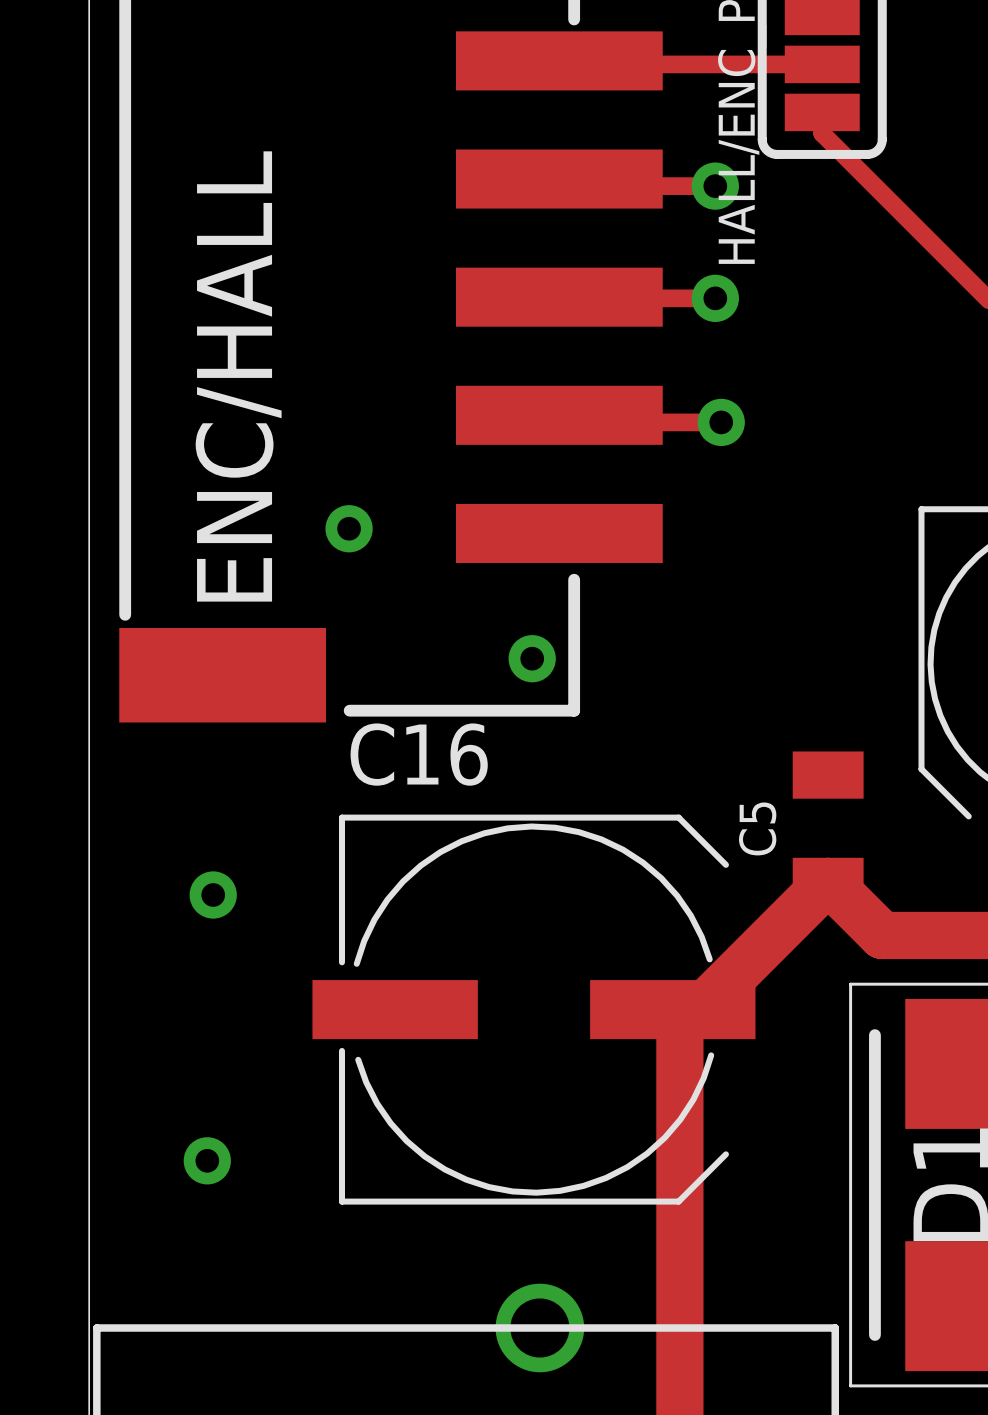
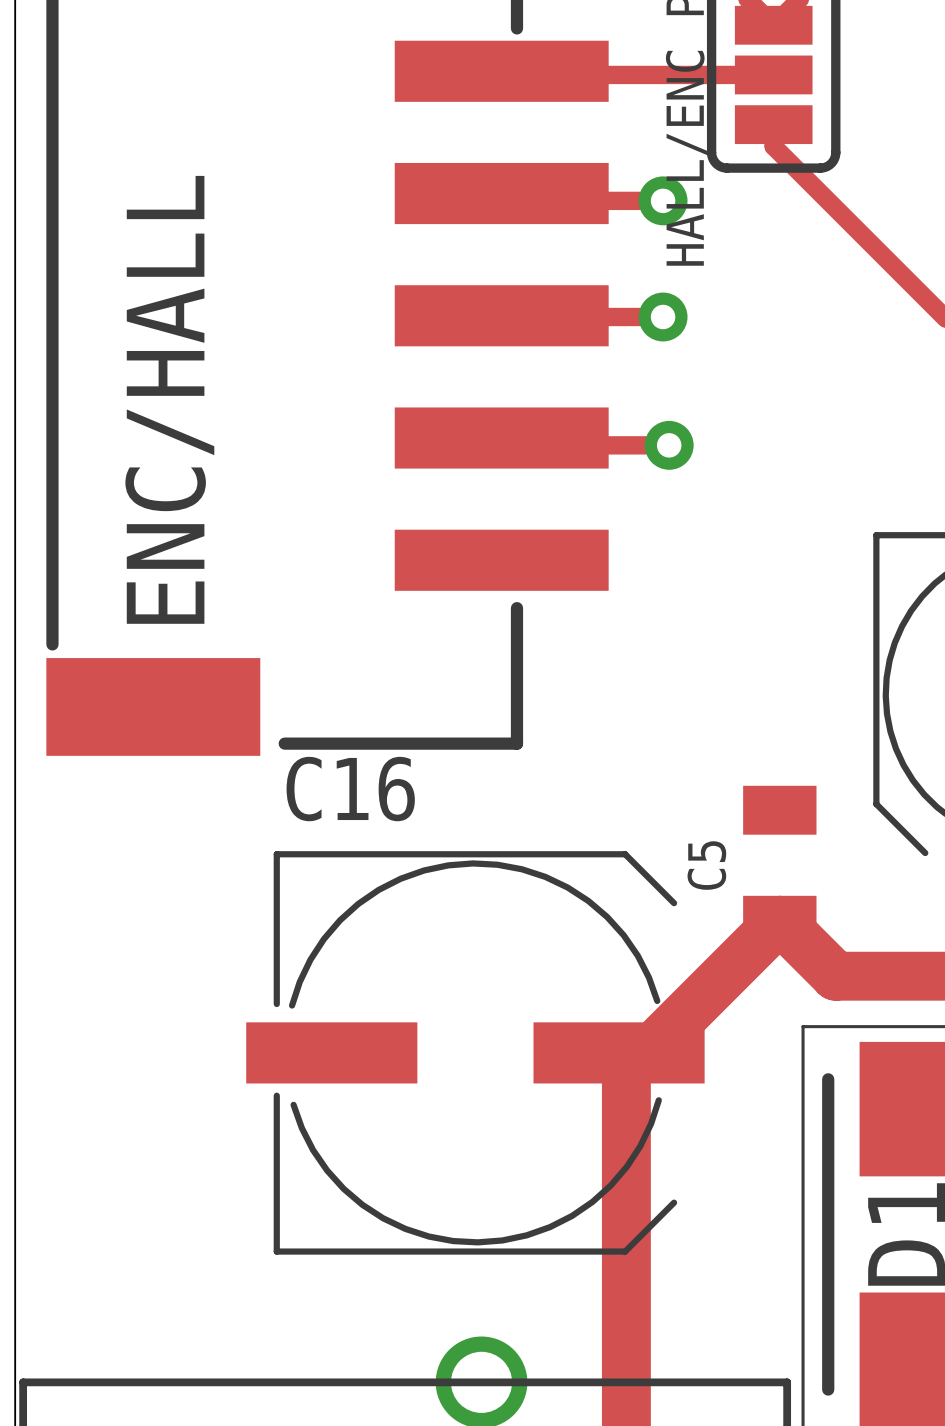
via: (349, 528) -> none
via: (532, 658) -> none
via: (213, 894) -> none
via: (207, 1160) -> none

